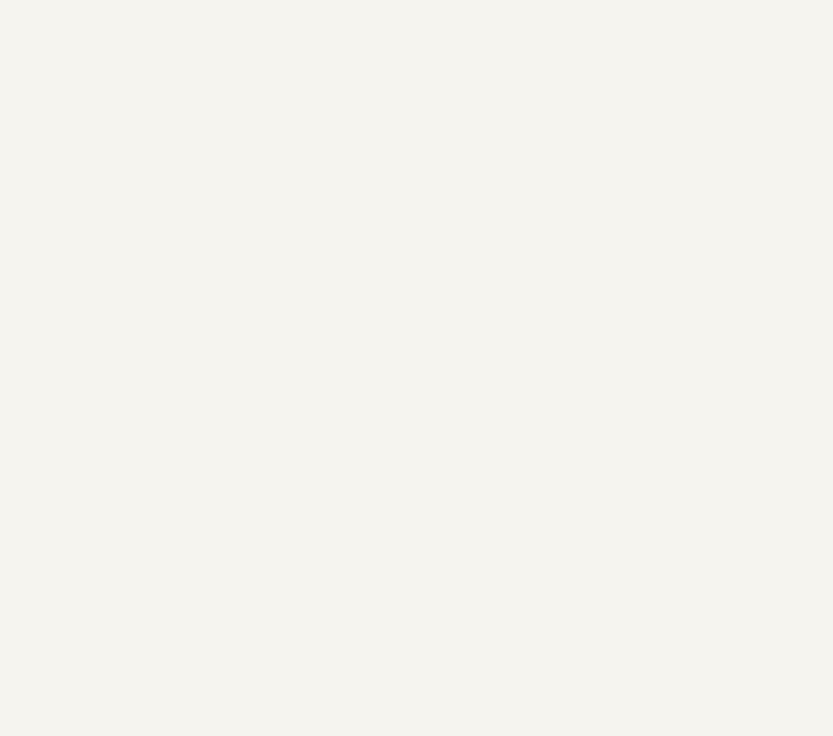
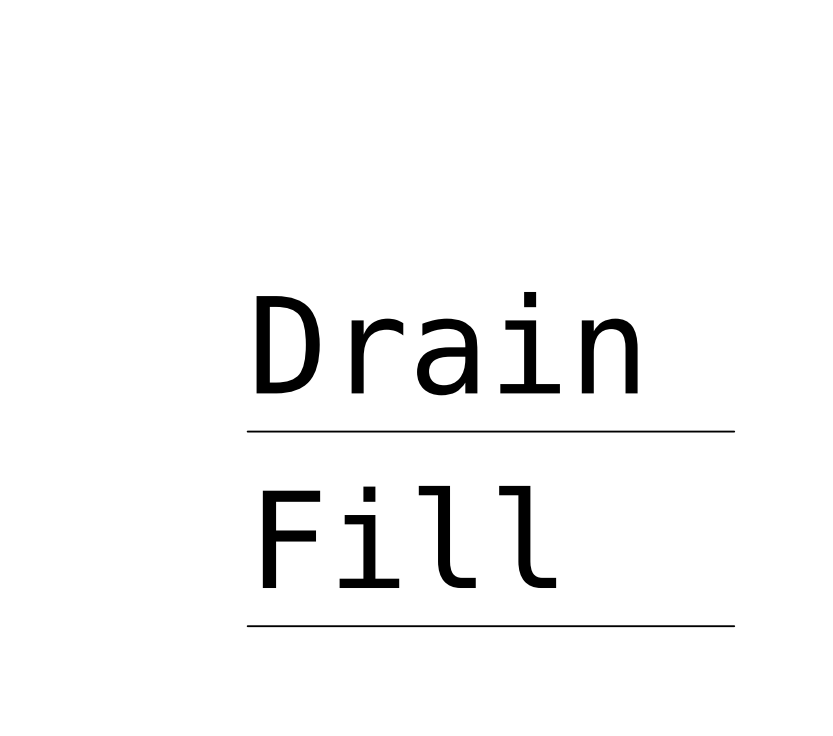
label: none -> Drain (447, 343)
wire: none -> (247, 431) (734, 431)
label: none -> Fill (409, 536)
wire: none -> (247, 626) (734, 626)

